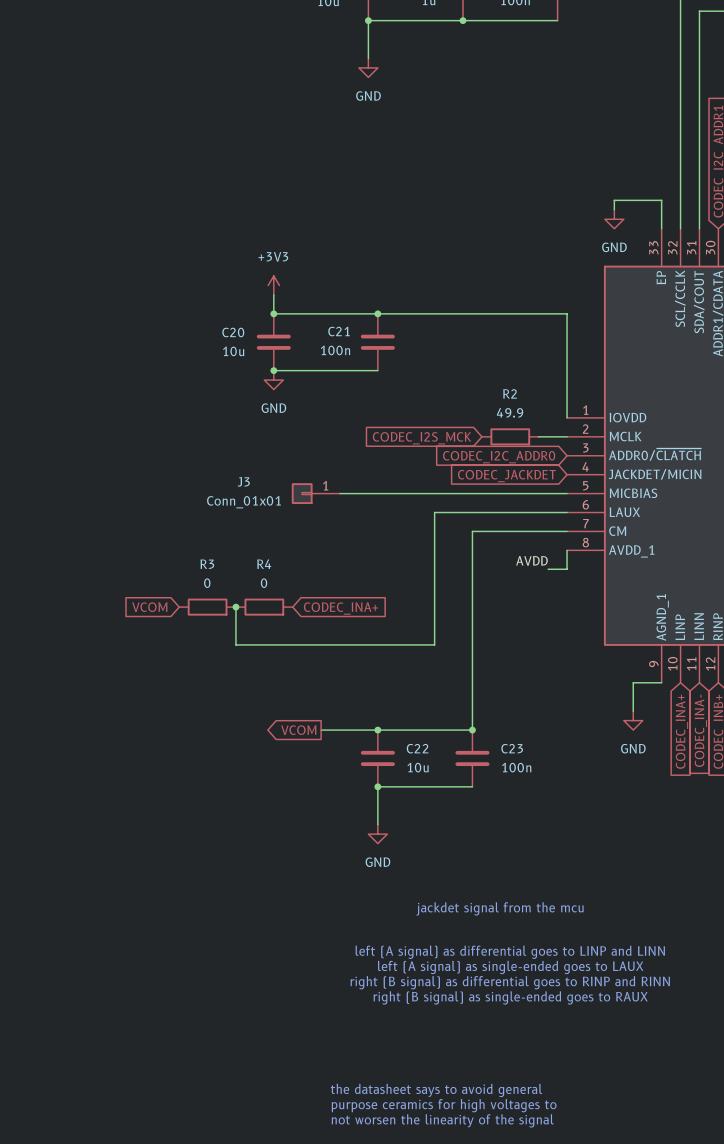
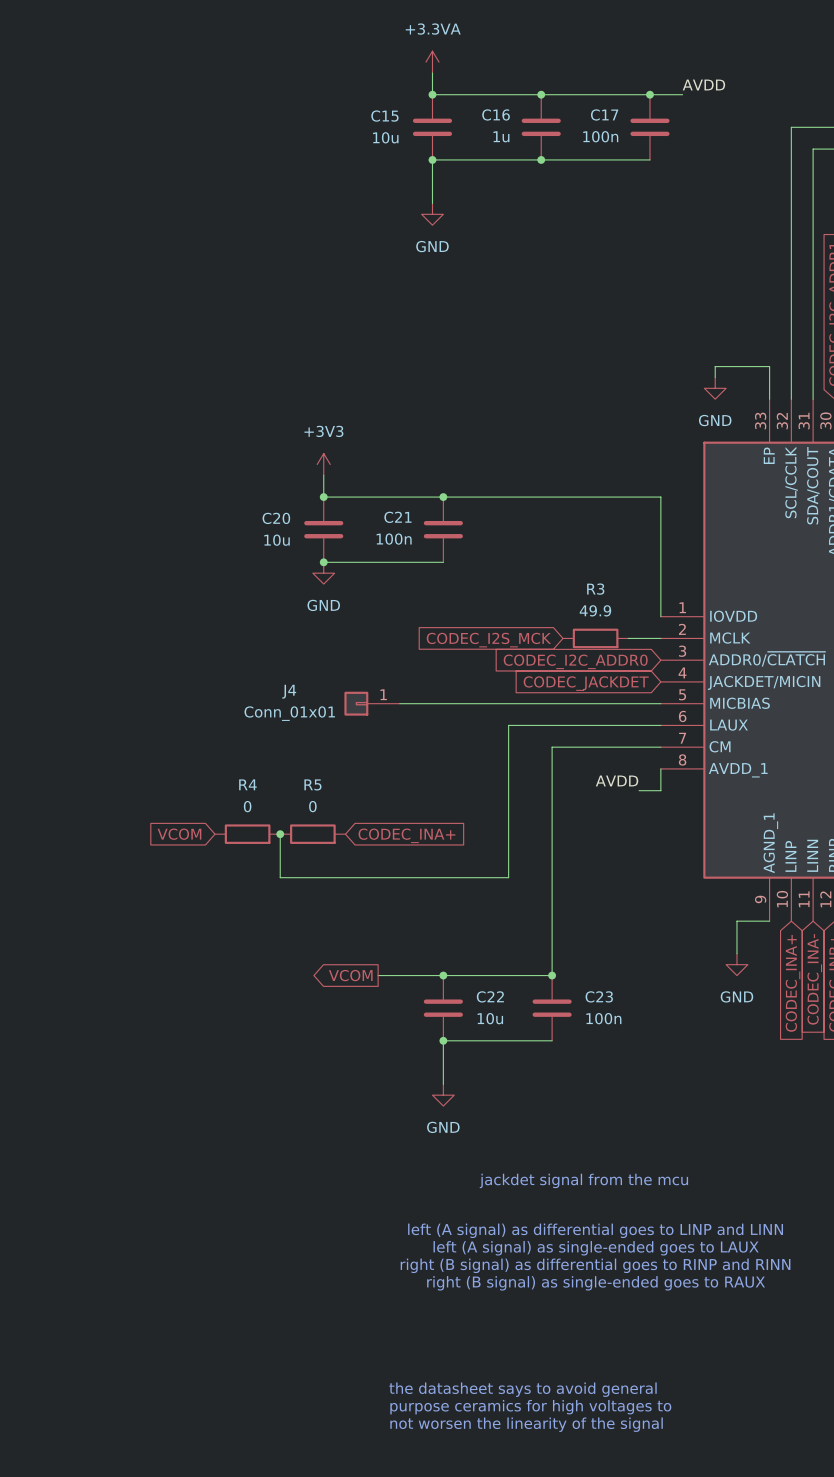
R2 name: R2 (510, 393) -> R3 (595, 589)
J3 name: J3 (243, 481) -> J4 (289, 691)
R3 name: R3 (207, 564) -> R4 (247, 784)
R4 name: R4 (264, 564) -> R5 (312, 784)

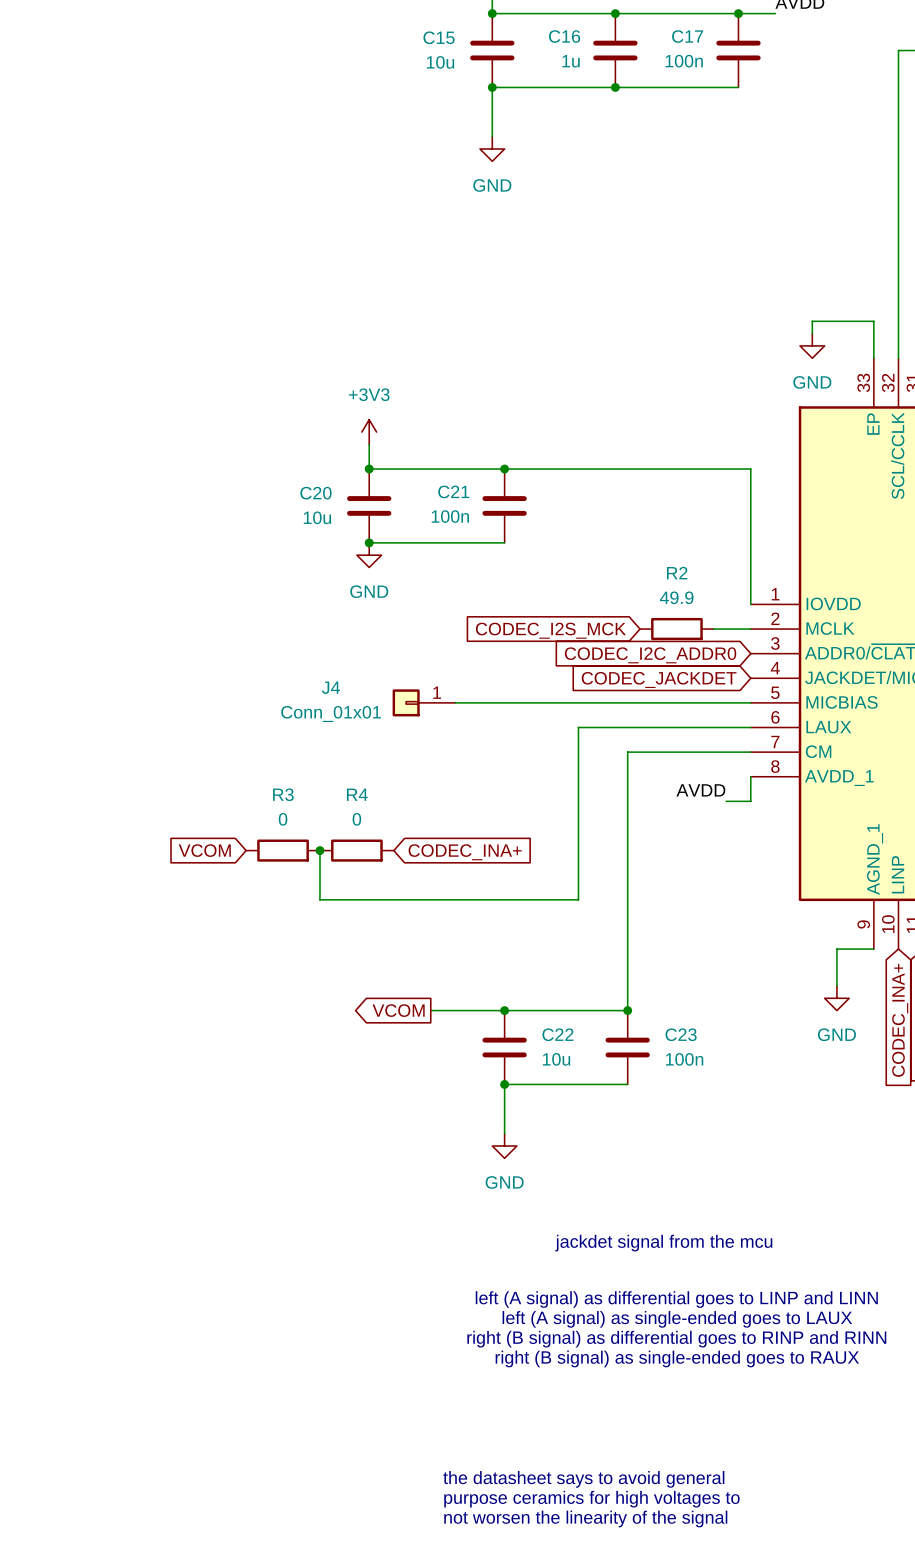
R3 name: R3 (595, 589) -> R2 (677, 573)
R4 name: R4 (247, 784) -> R3 (283, 794)
R5 name: R5 (312, 784) -> R4 (357, 794)

